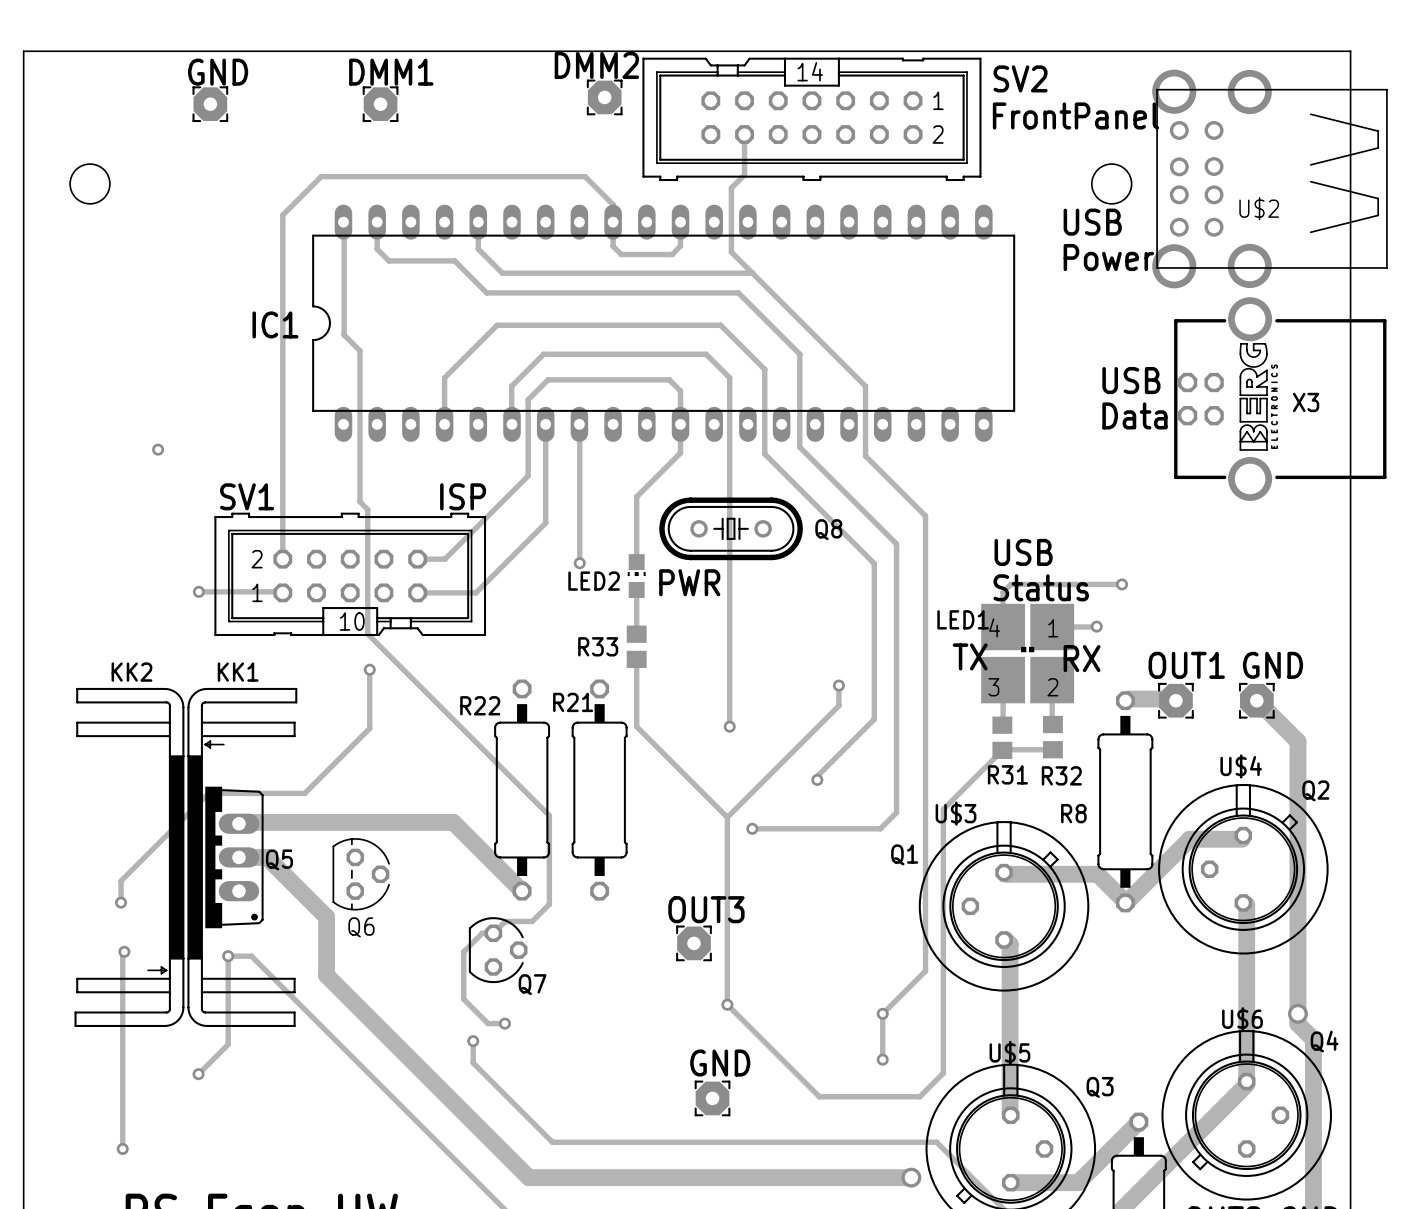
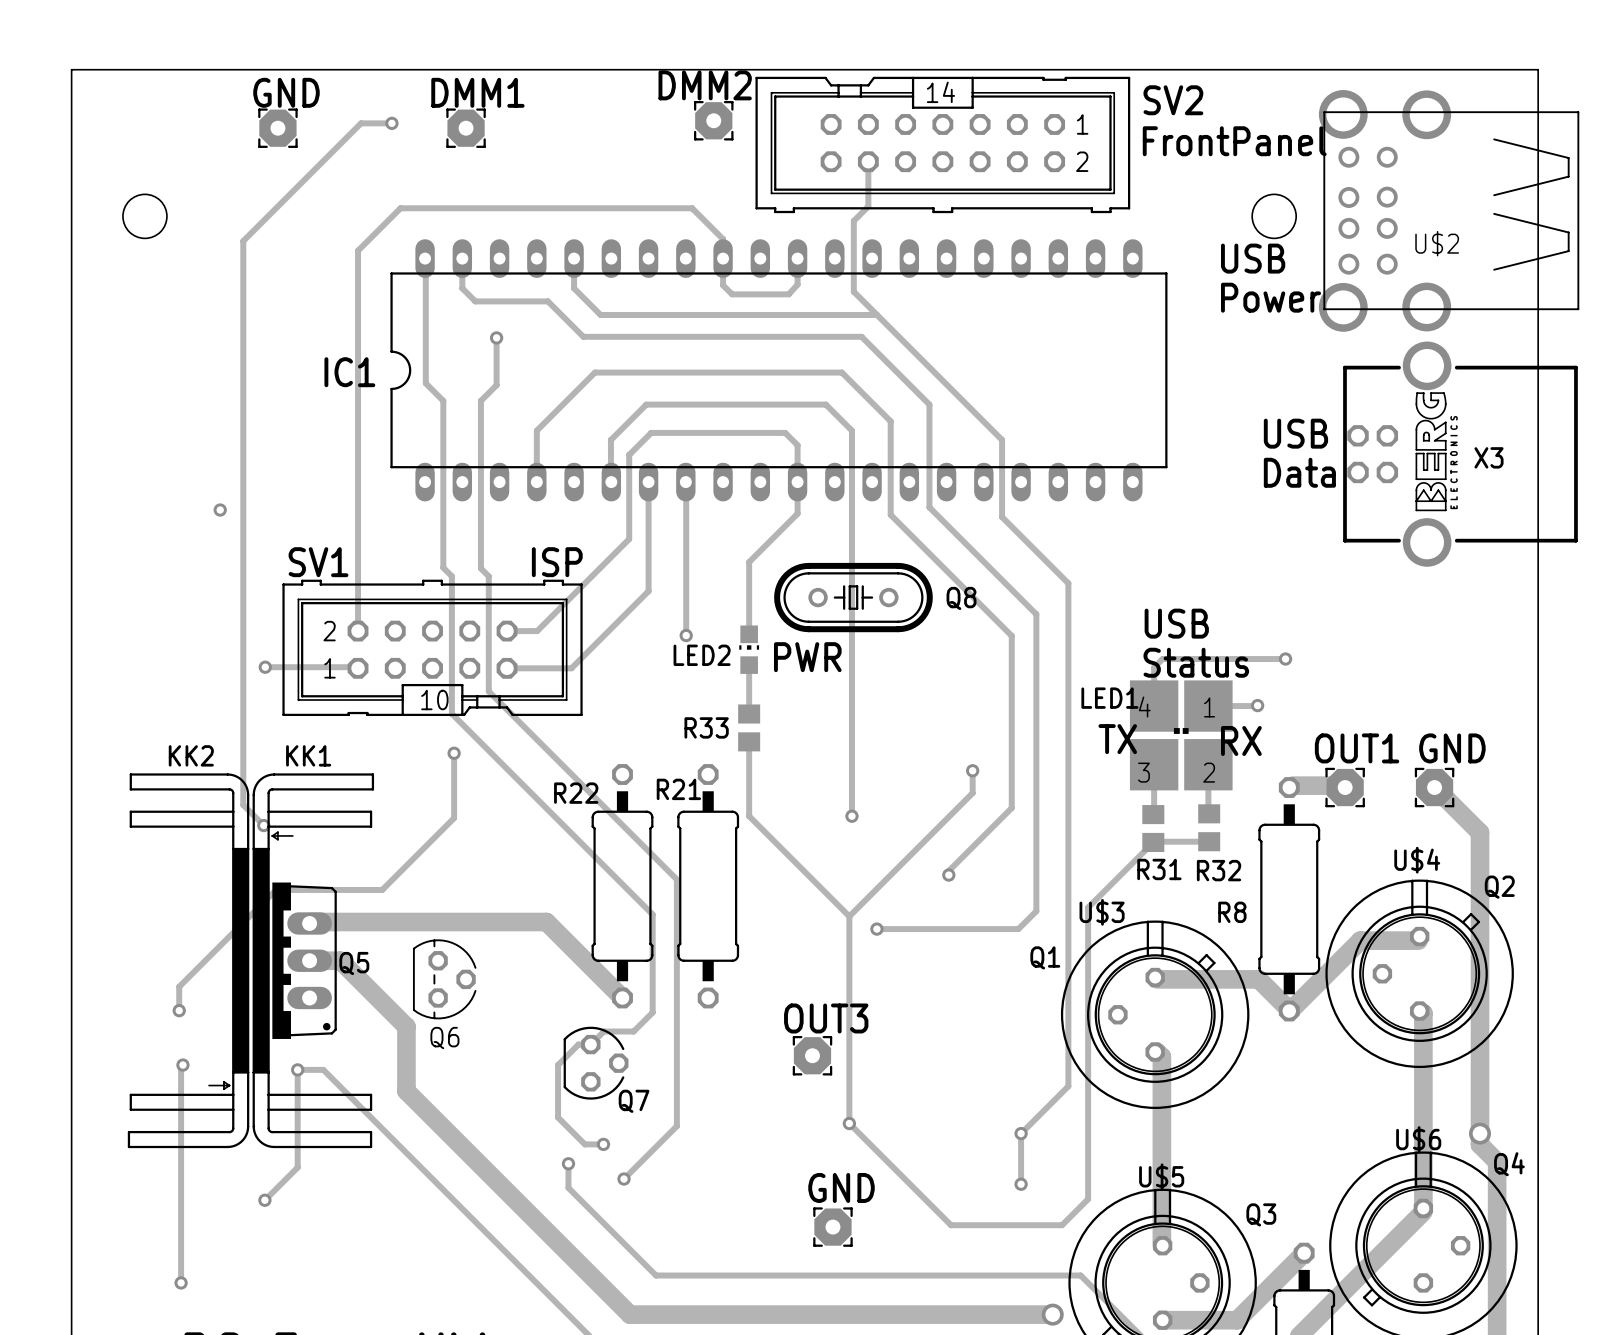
track: none -> (391, 123) (361, 123) (243, 241) (243, 805) (263, 825)
via: none -> (391, 123)
track: none -> (496, 337) (496, 385) (480, 400) (480, 568) (488, 576) (488, 691) (676, 879) (676, 1126) (623, 1179)
via: none -> (496, 337)
via: none -> (263, 825)
via: none -> (623, 1179)

